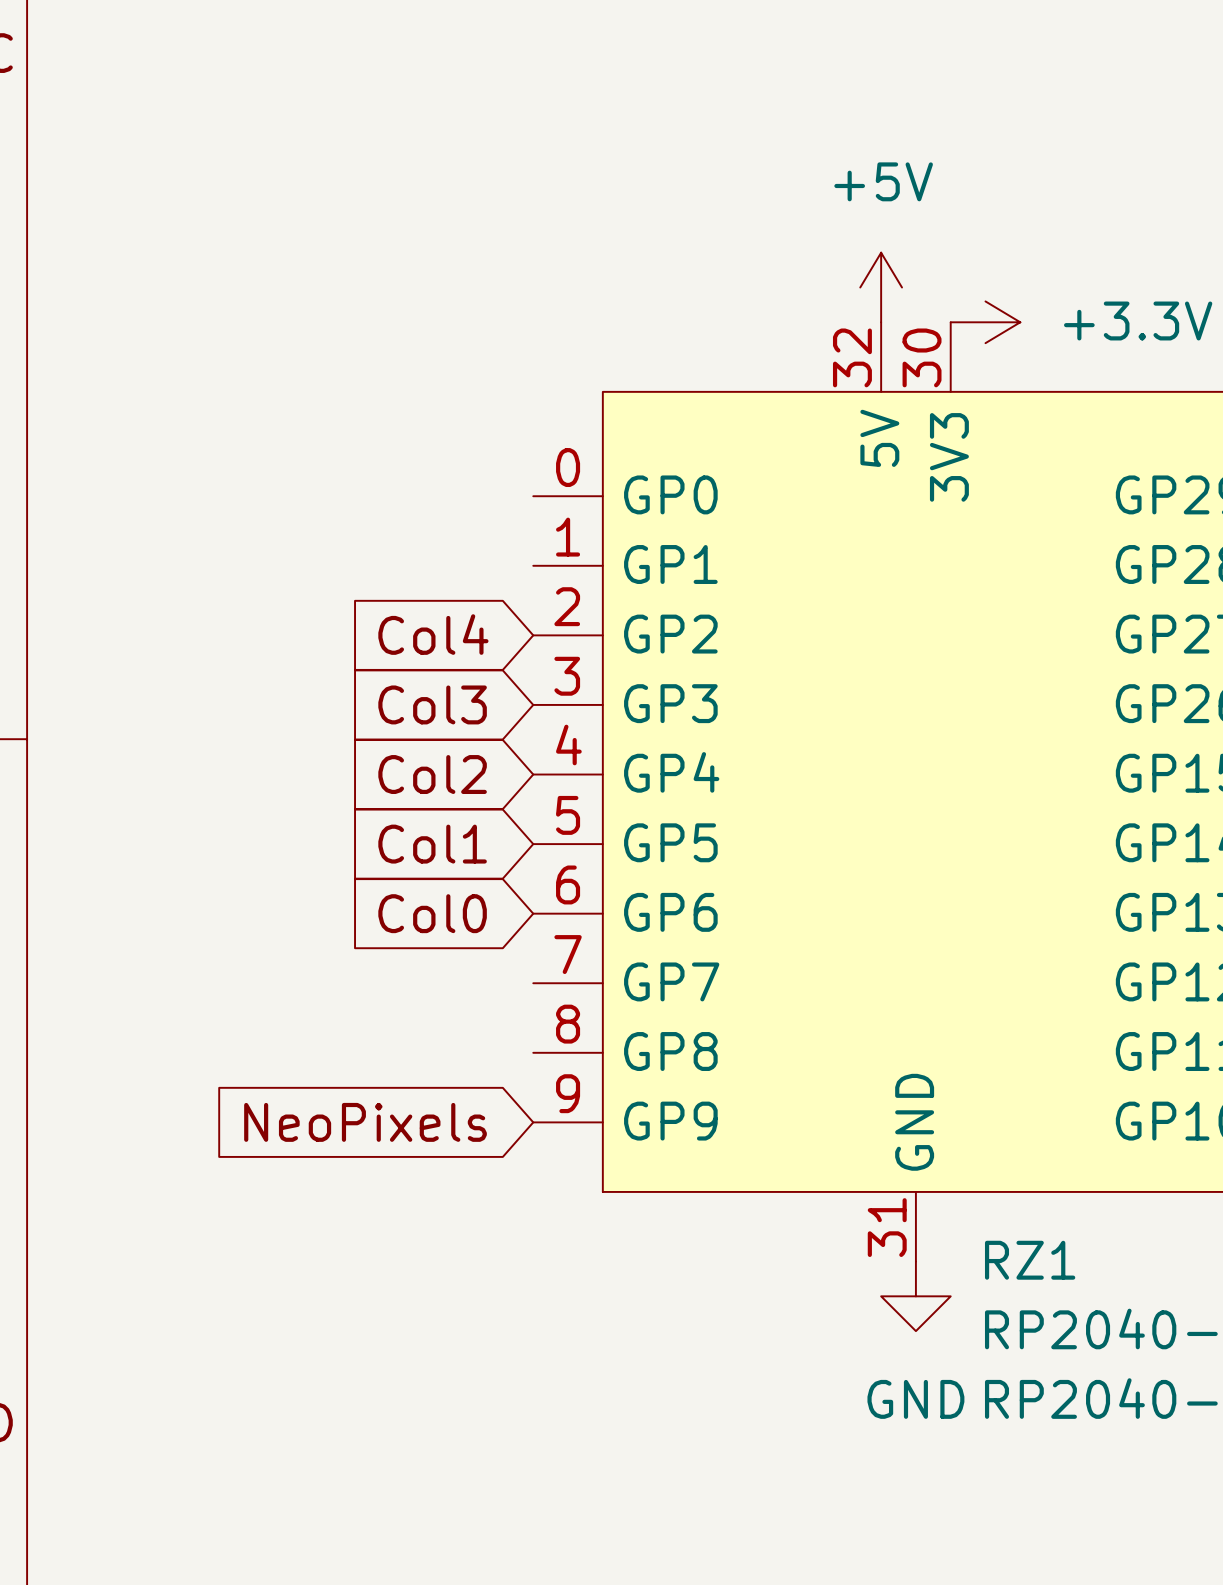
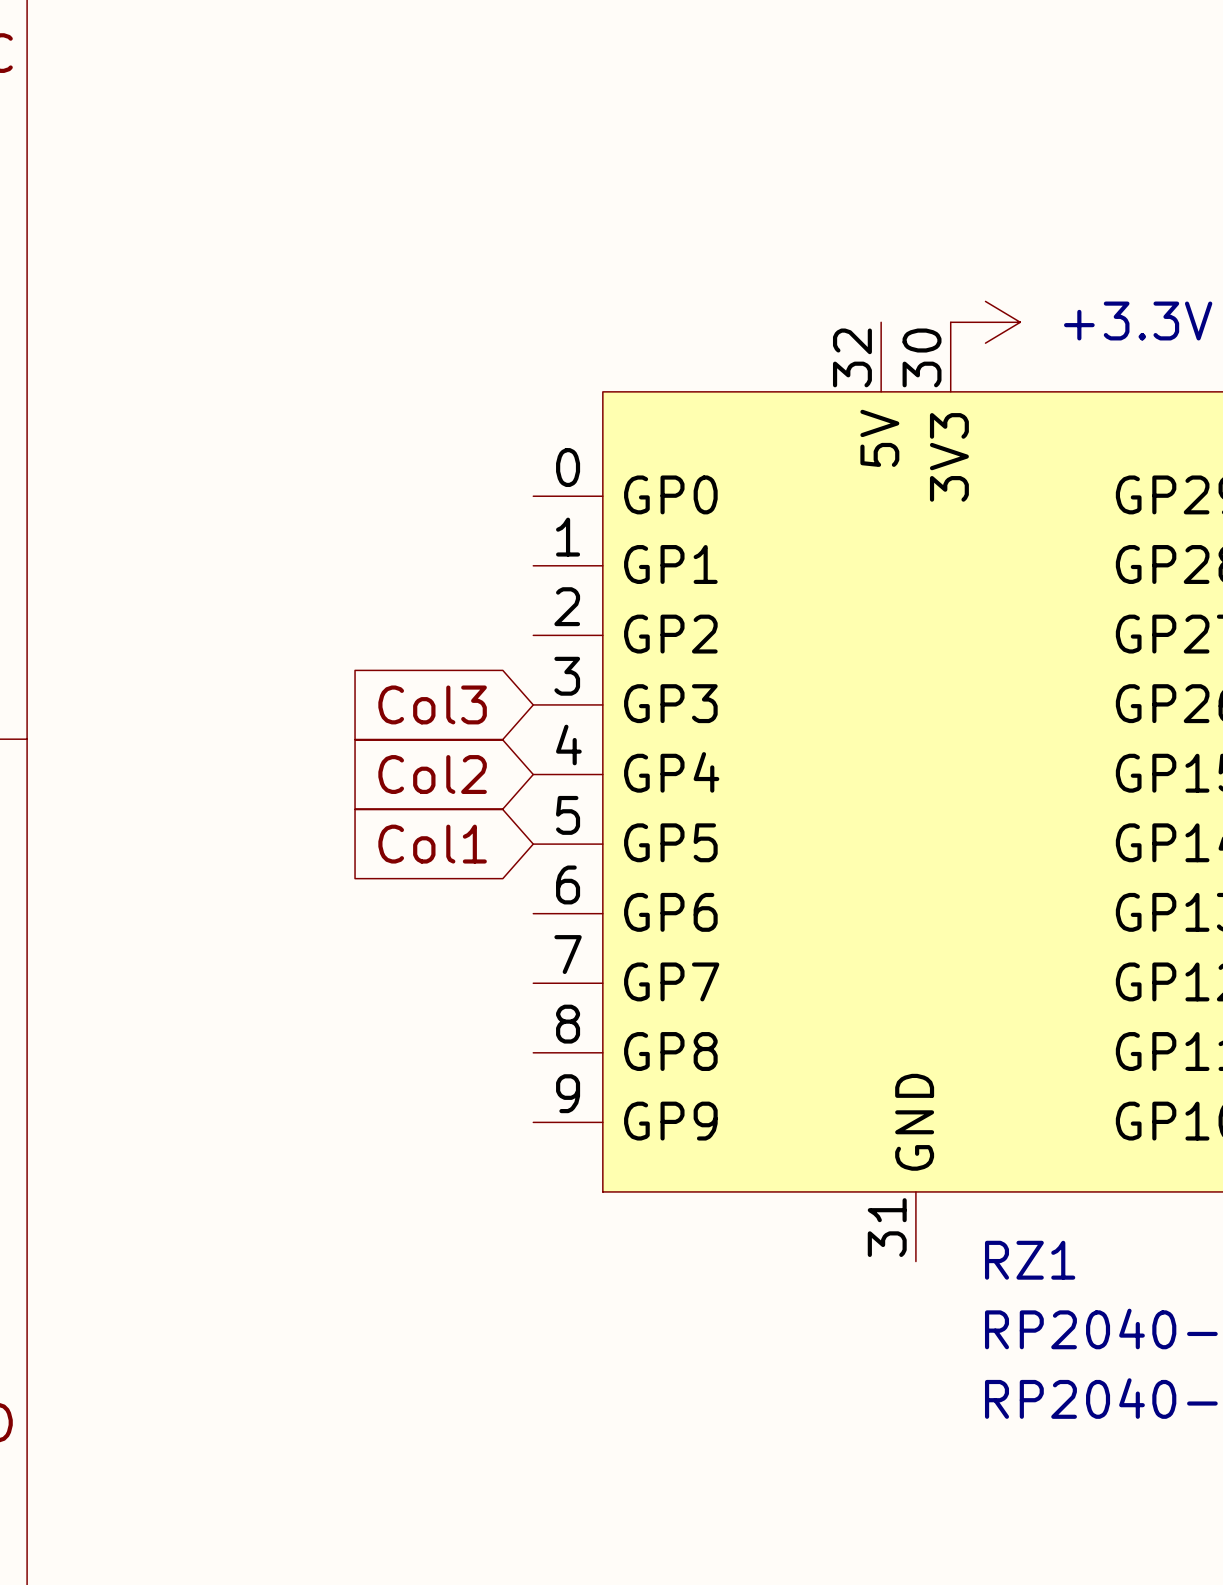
power symbol: +5V (881, 287) -> none
global label: Col4 (433, 634) -> none
global label: Col0 (432, 913) -> none
global label: NeoPixels (365, 1122) -> none
power symbol: GND (915, 1296) -> none

